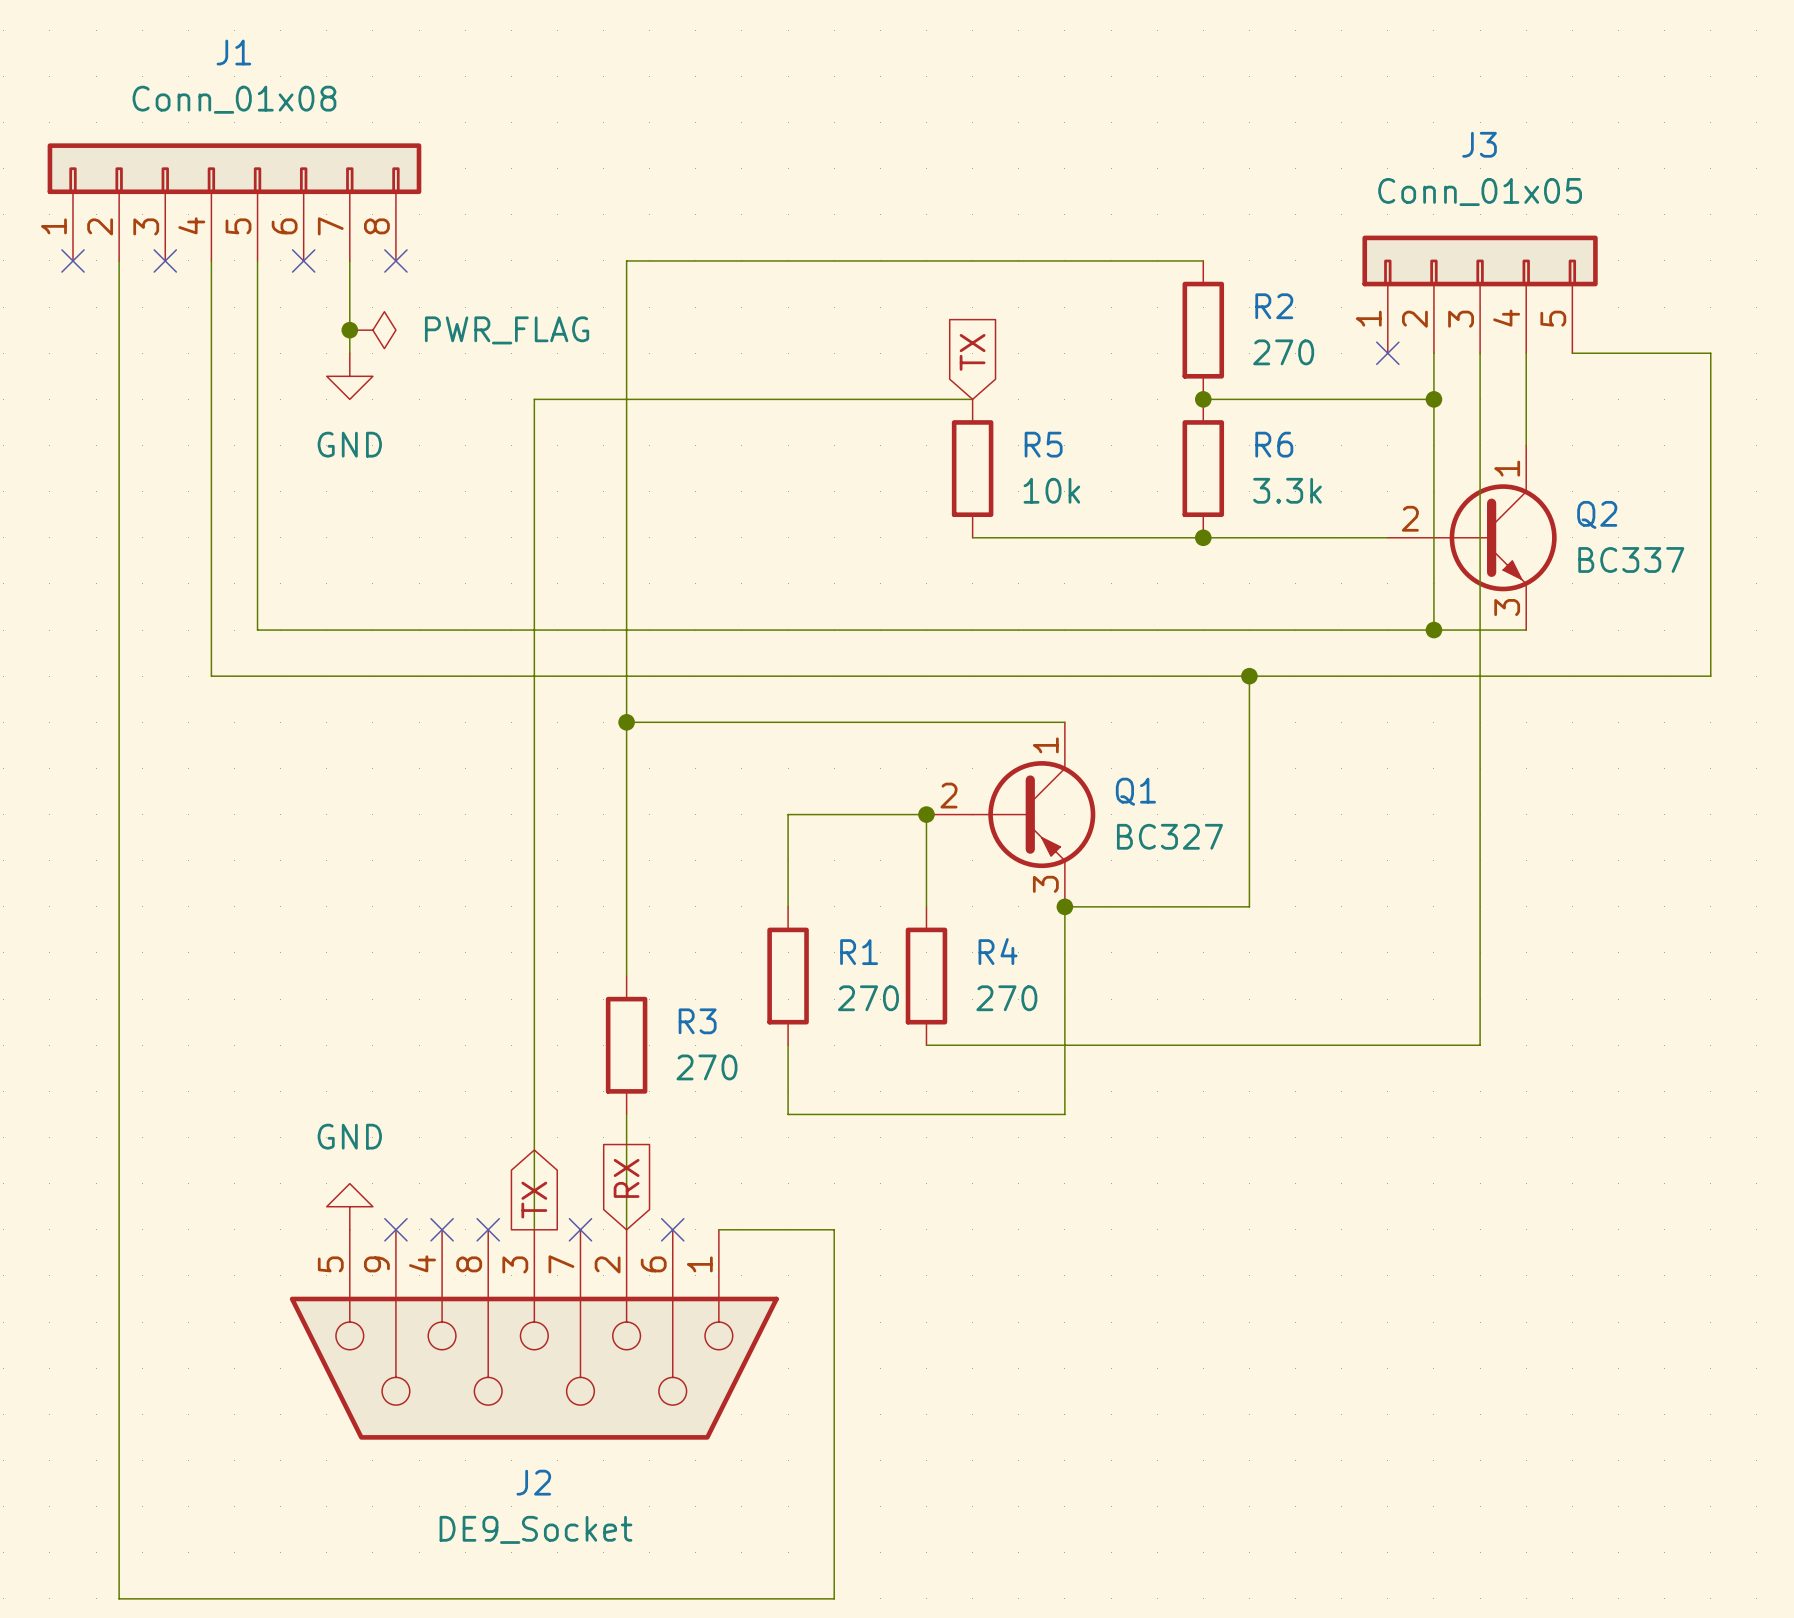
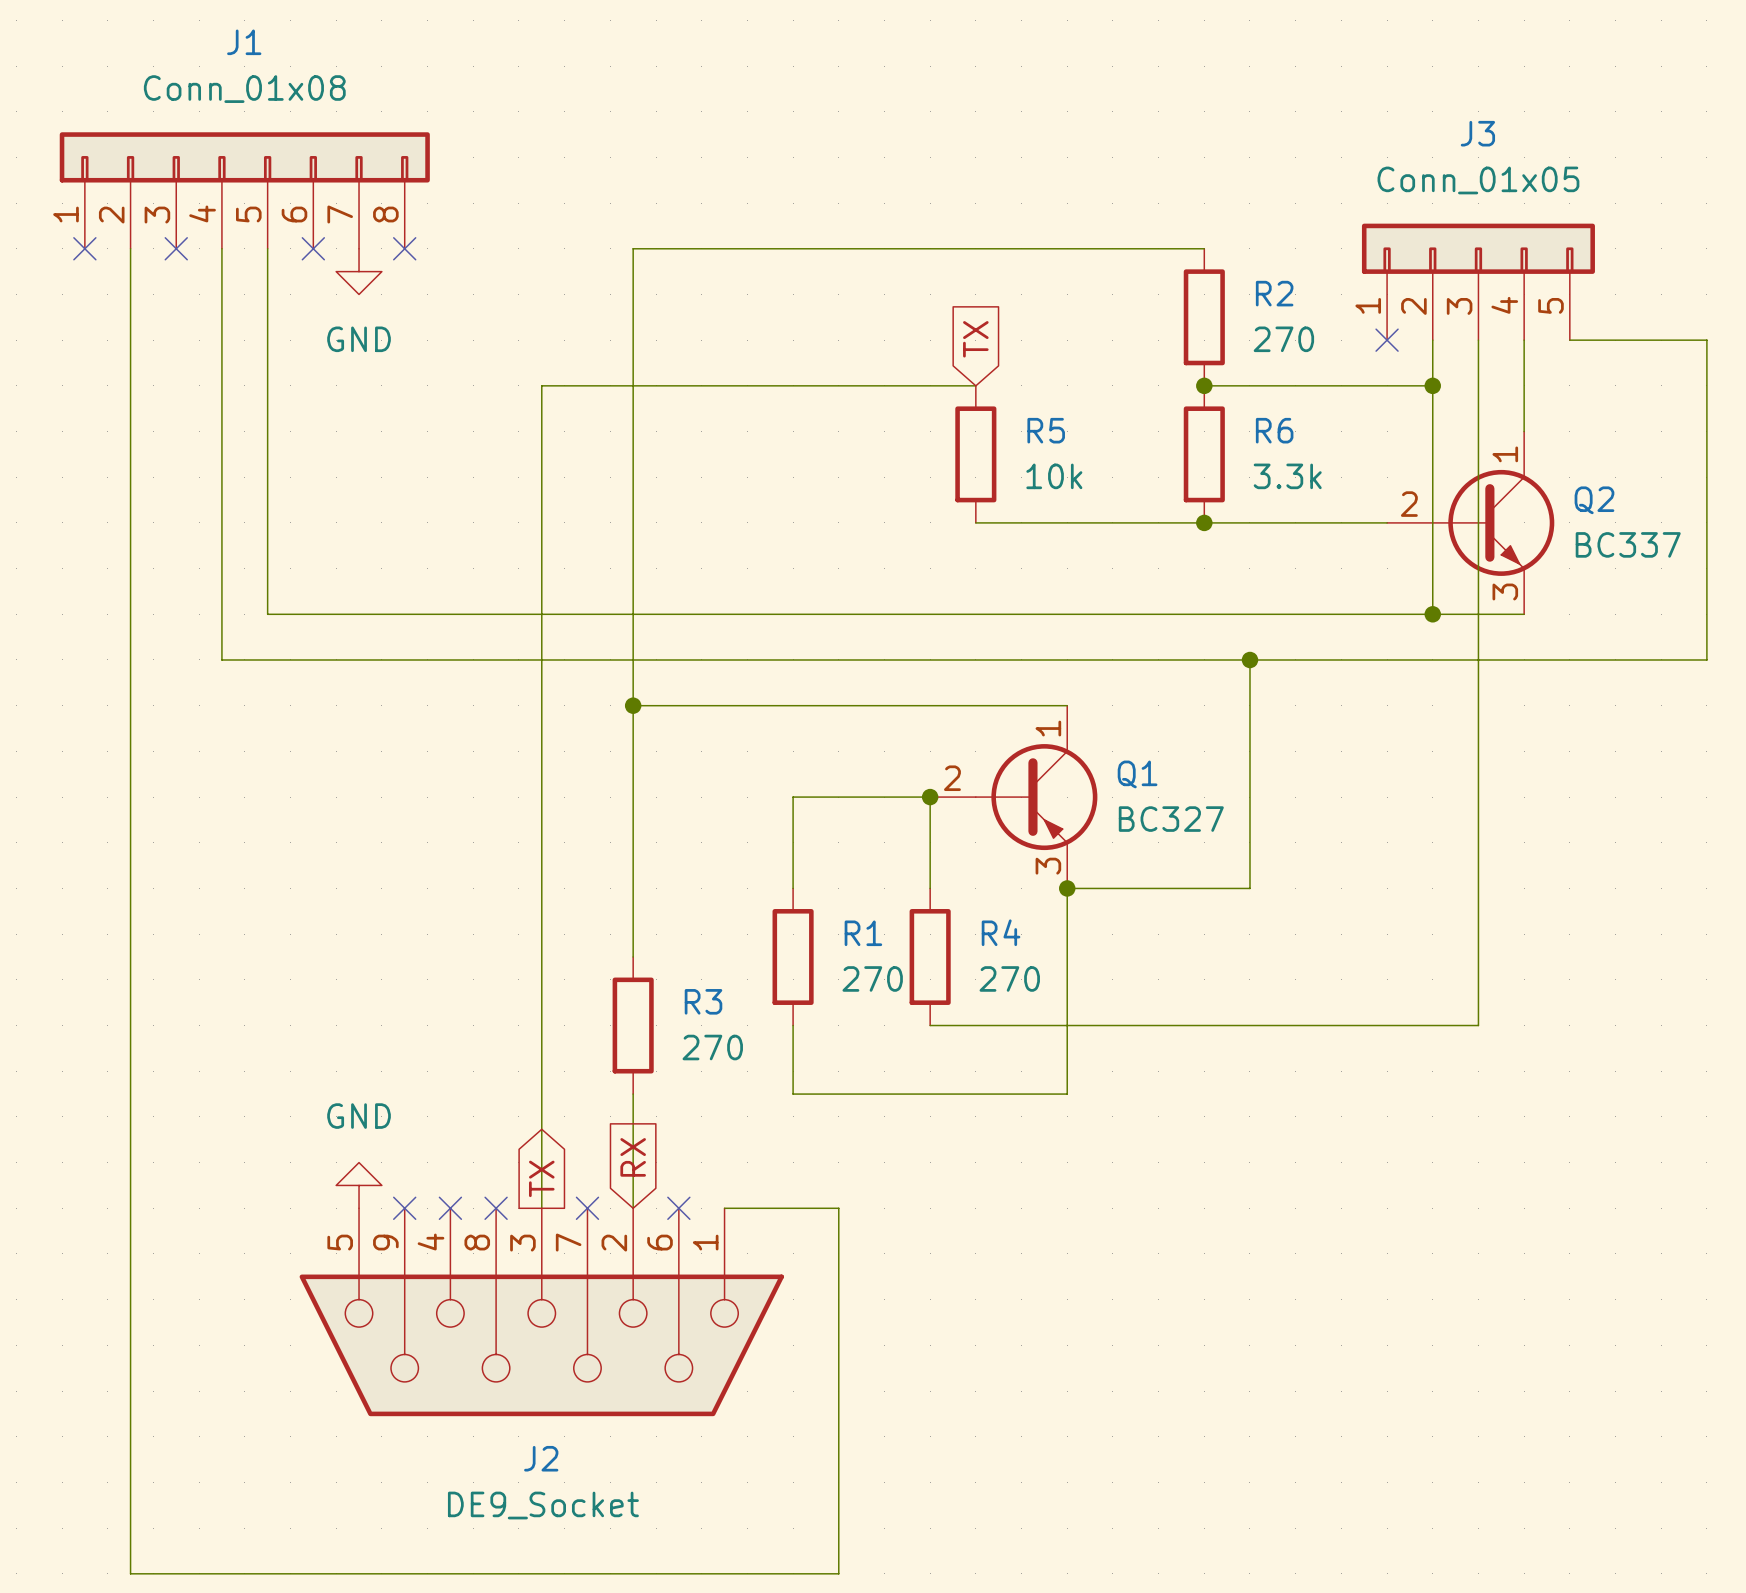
wire: (349, 260) (349, 353) -> none
junction: (349, 330) -> none
power symbol: PWR_FLAG (372, 330) -> none
power symbol position: GND (349, 376) -> GND (359, 271)

